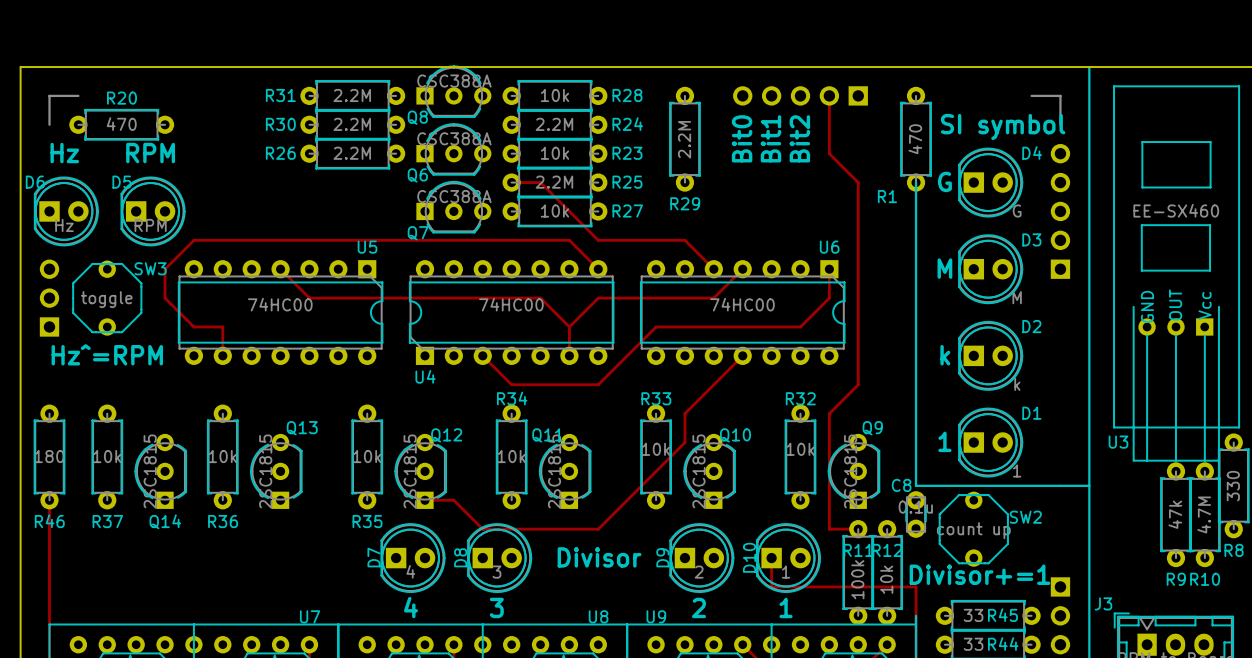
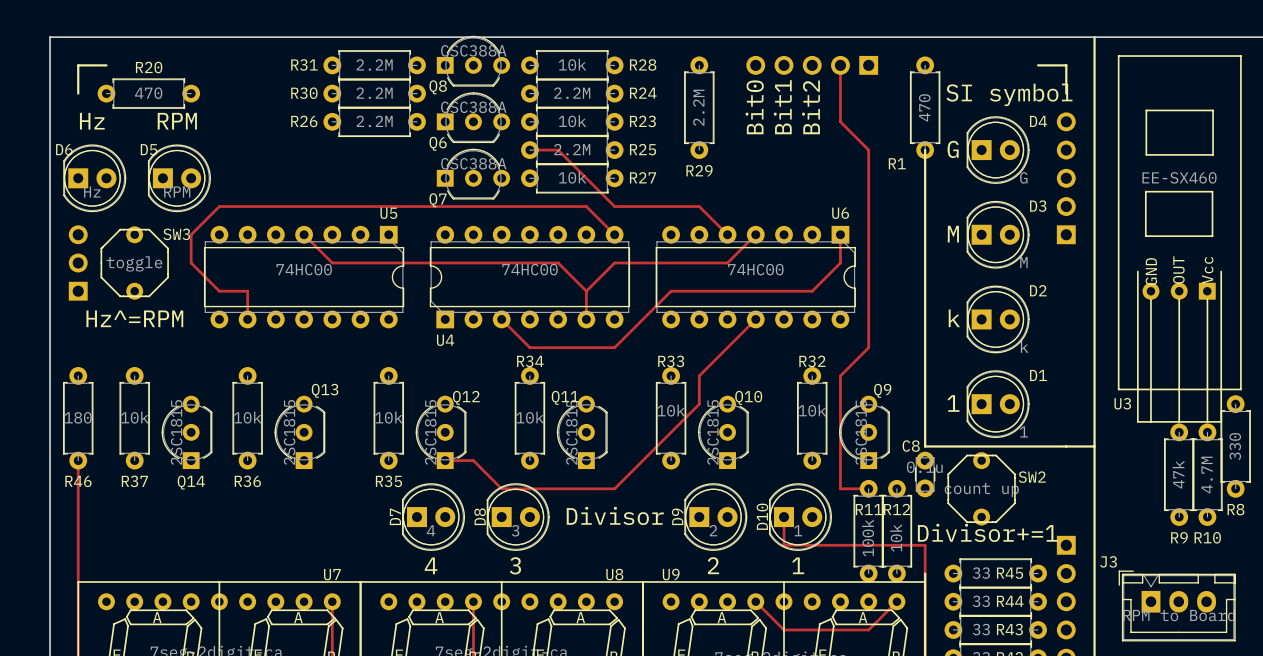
line: (78, 95) (49, 95) (49, 124) -> none
line: none -> (106, 65) (78, 65) (78, 93)
line: (1031, 95) (1060, 95) (1060, 124) -> none
line: none -> (1038, 65) (1066, 65) (1066, 93)

